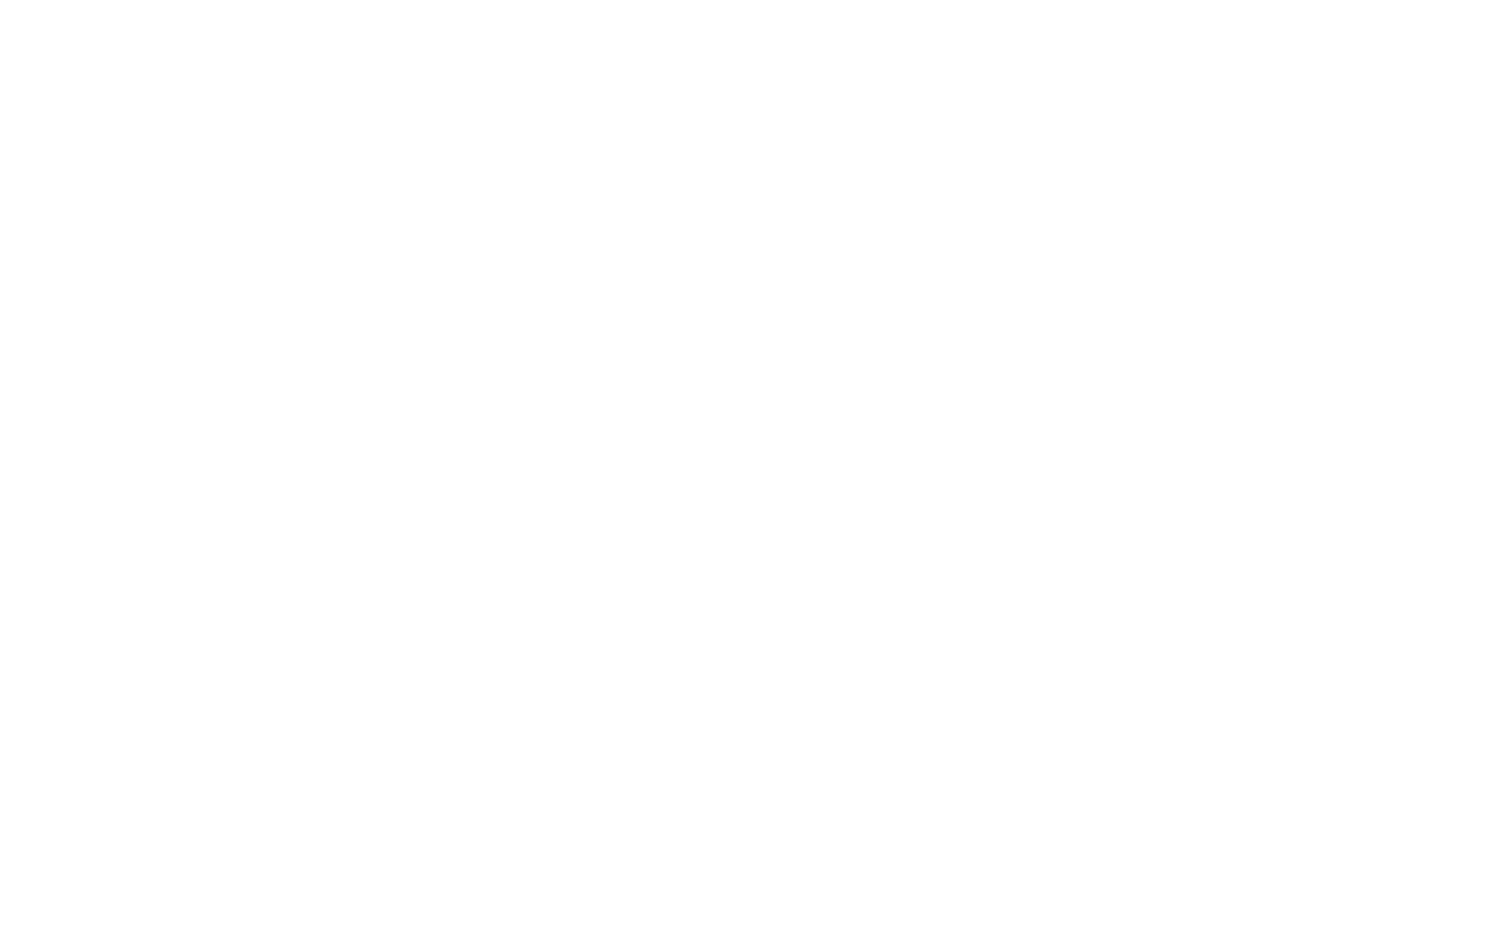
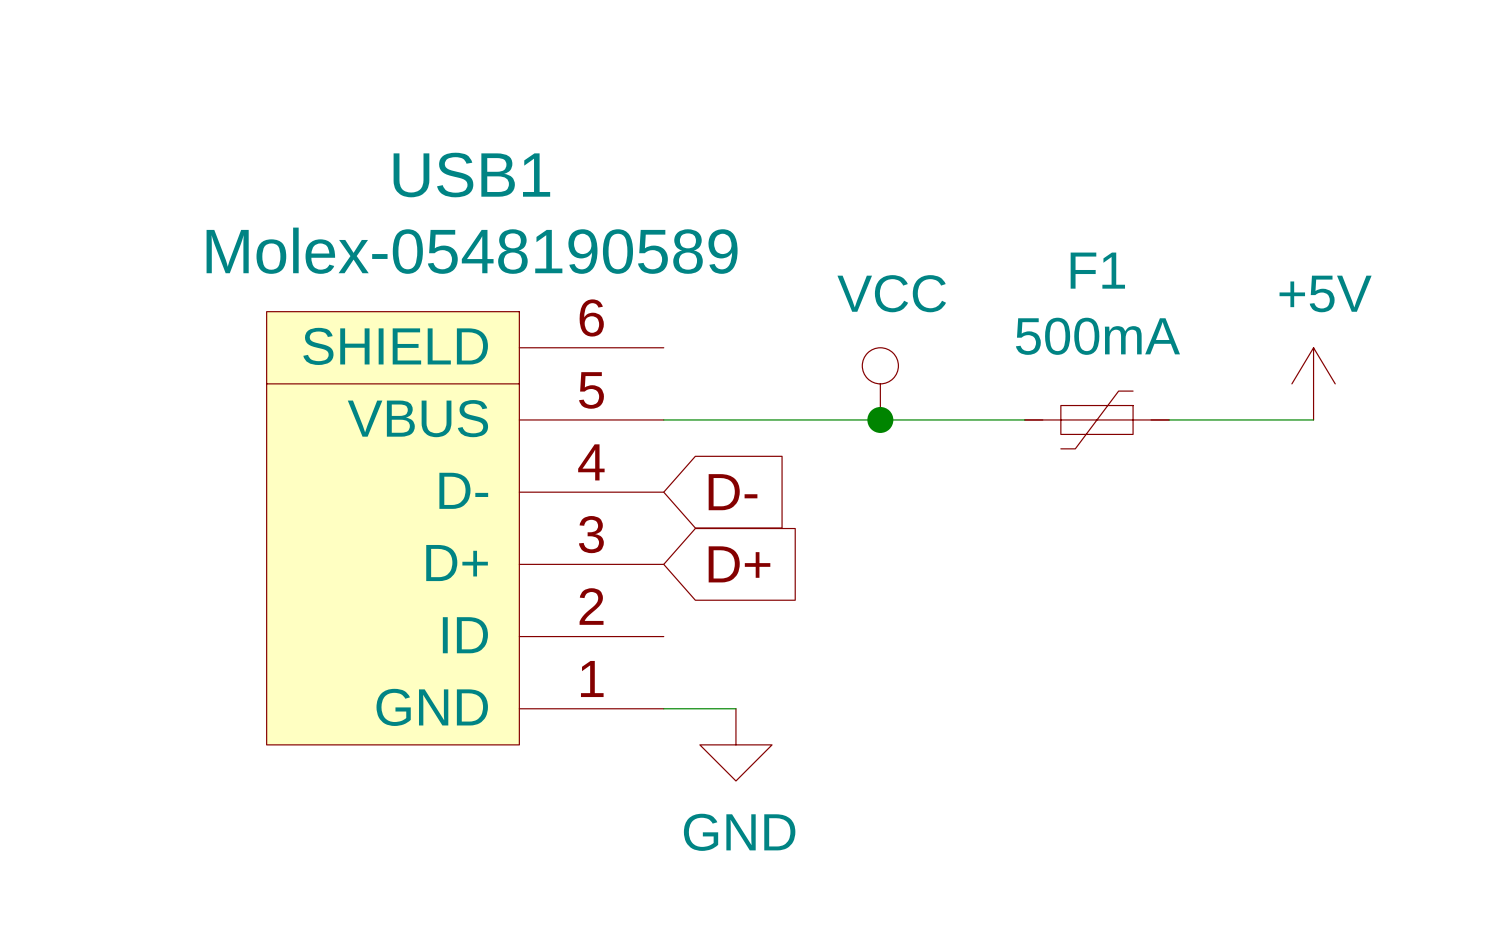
power symbol: none -> VCC (880, 383)
power symbol: none -> +5V (1313, 383)
wire: none -> (663, 419) (1024, 419)
junction: none -> (880, 419)
F1: none -> 500mA (1096, 419)
wire: none -> (1169, 419) (1313, 419)
global label: none -> D- (733, 492)
USB1: none -> Molex-0548190589 (465, 528)
global label: none -> D+ (739, 564)
wire: none -> (663, 708) (735, 708)
power symbol: none -> GND (735, 744)

